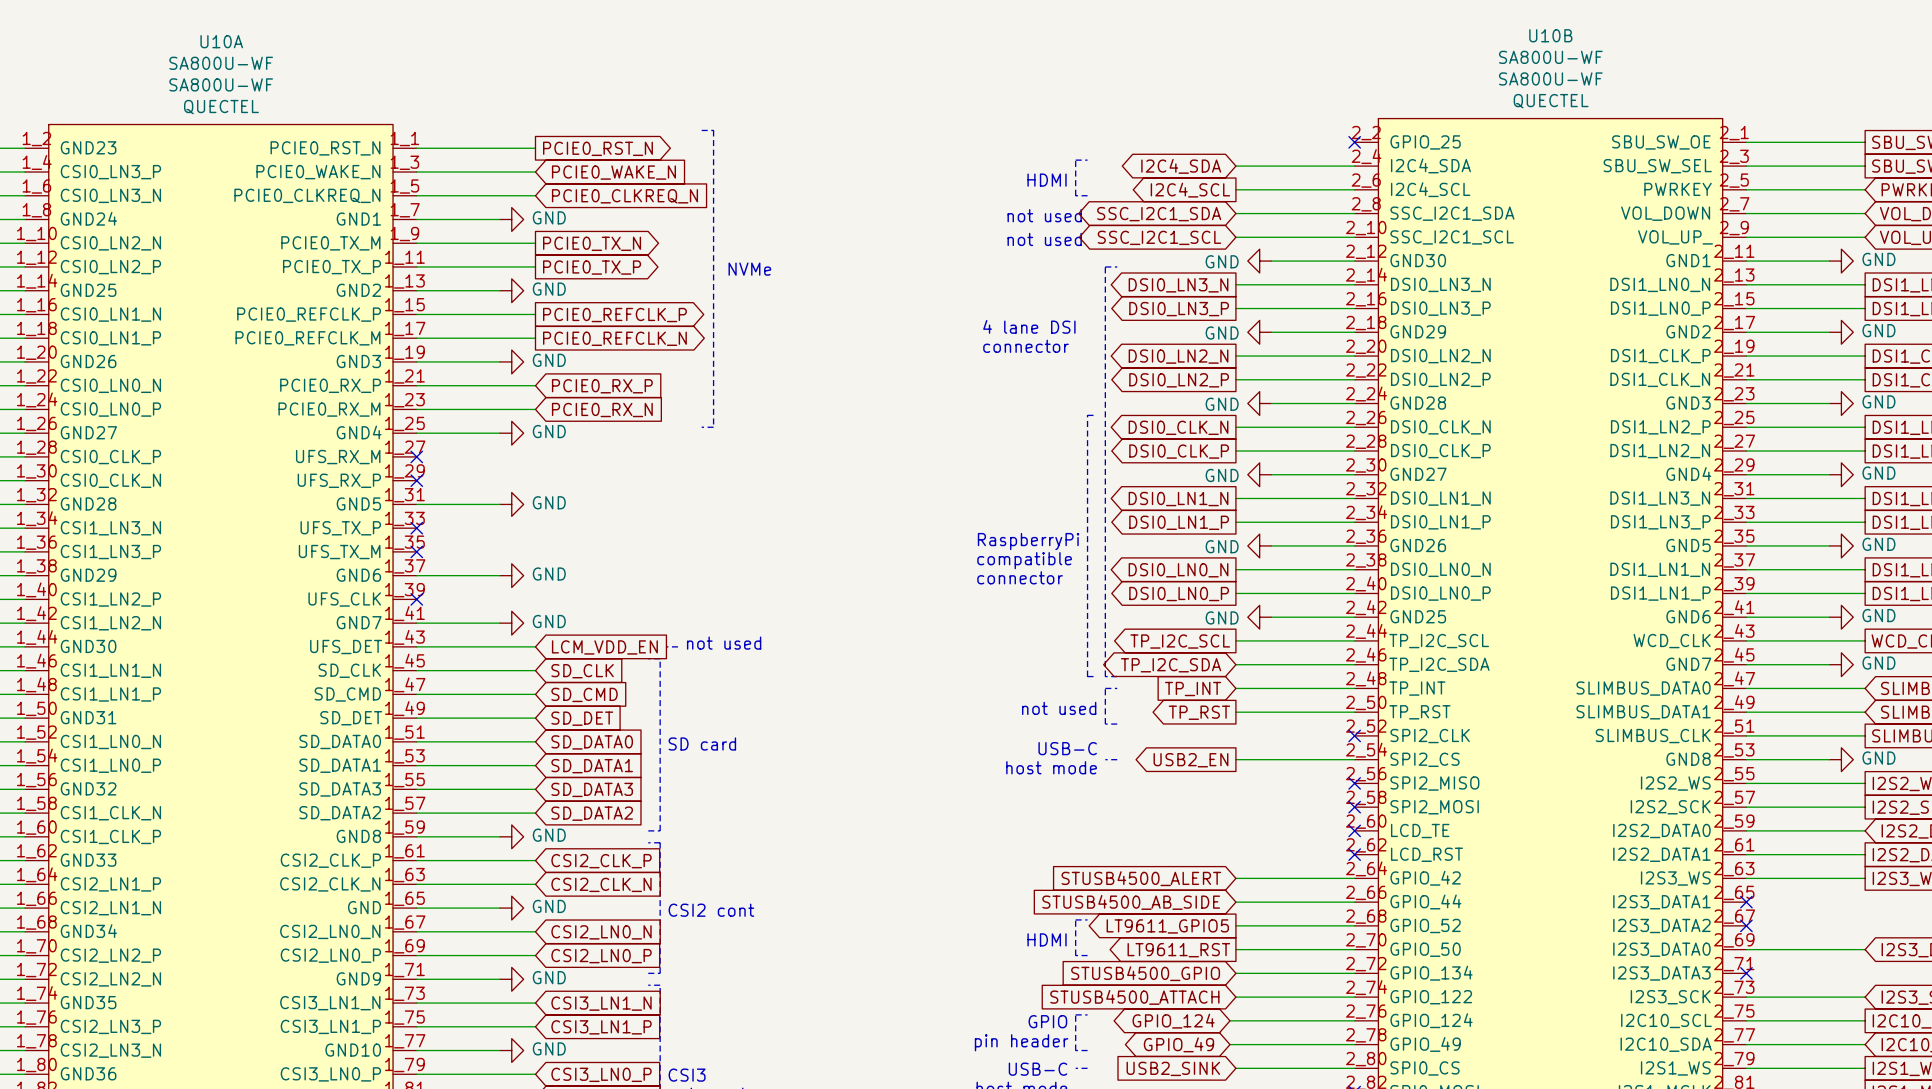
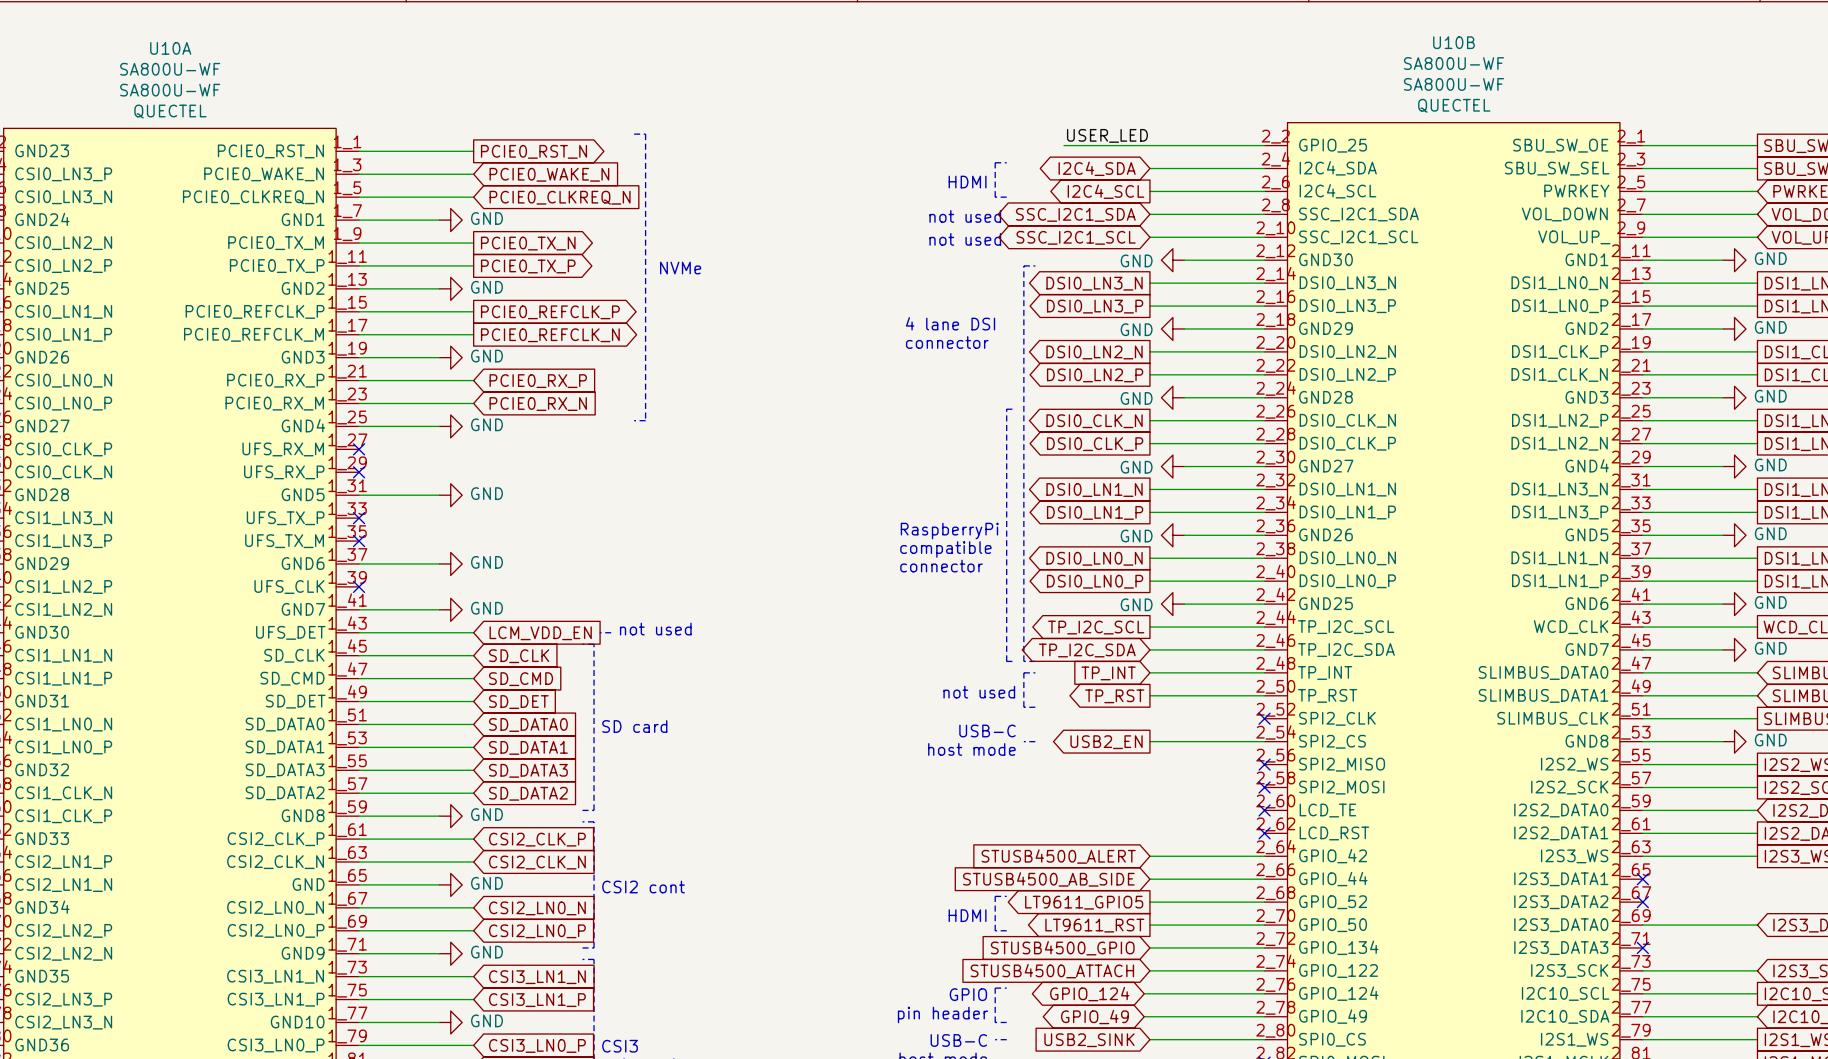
label: none -> USER_LED (1107, 135)
wire: none -> (1063, 145) (1264, 145)
no-connect mark: (1354, 142) -> none

